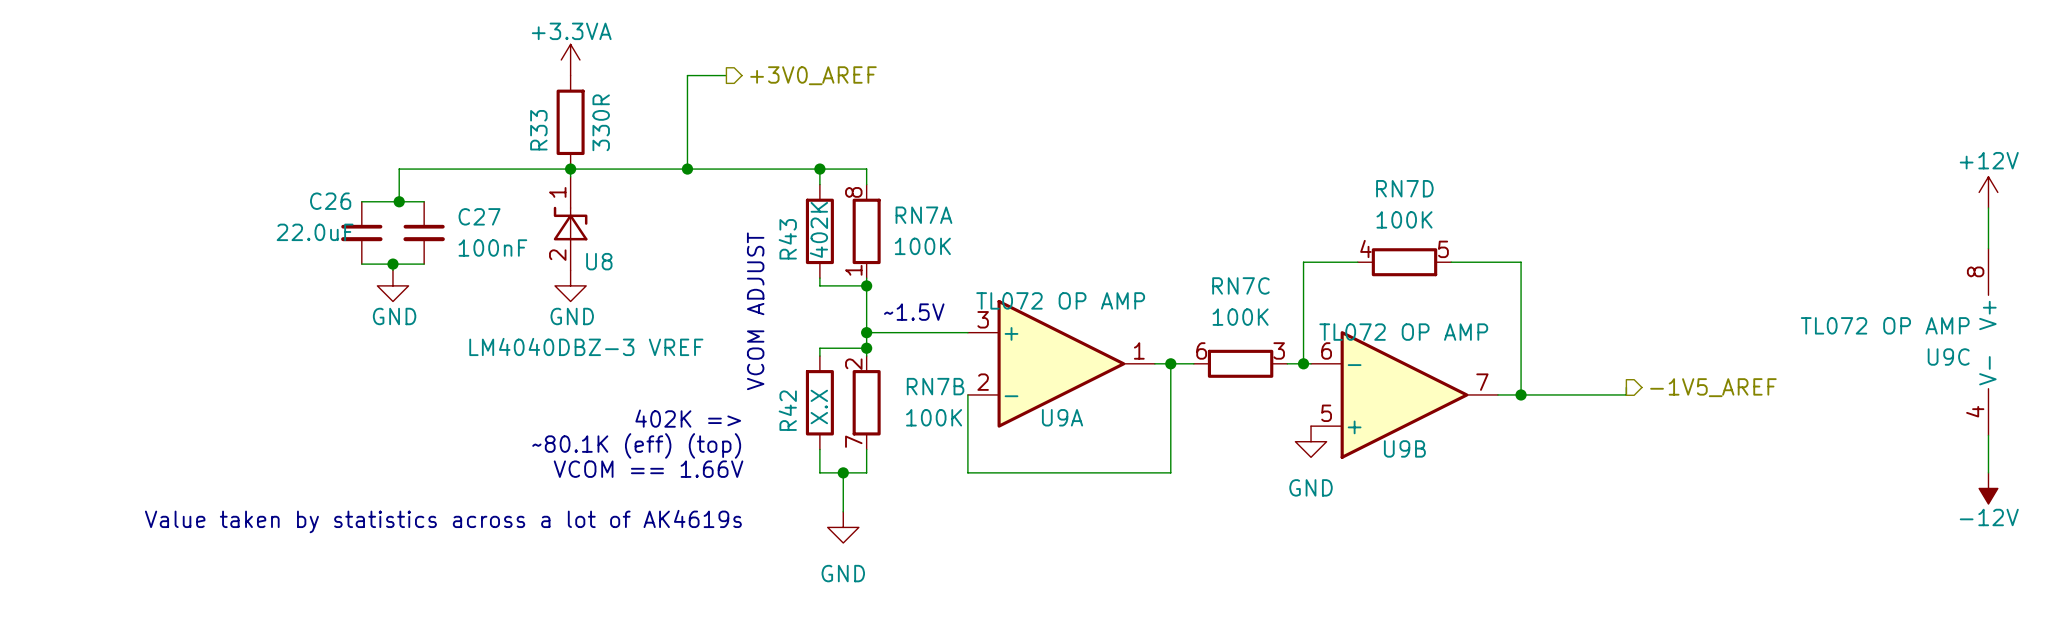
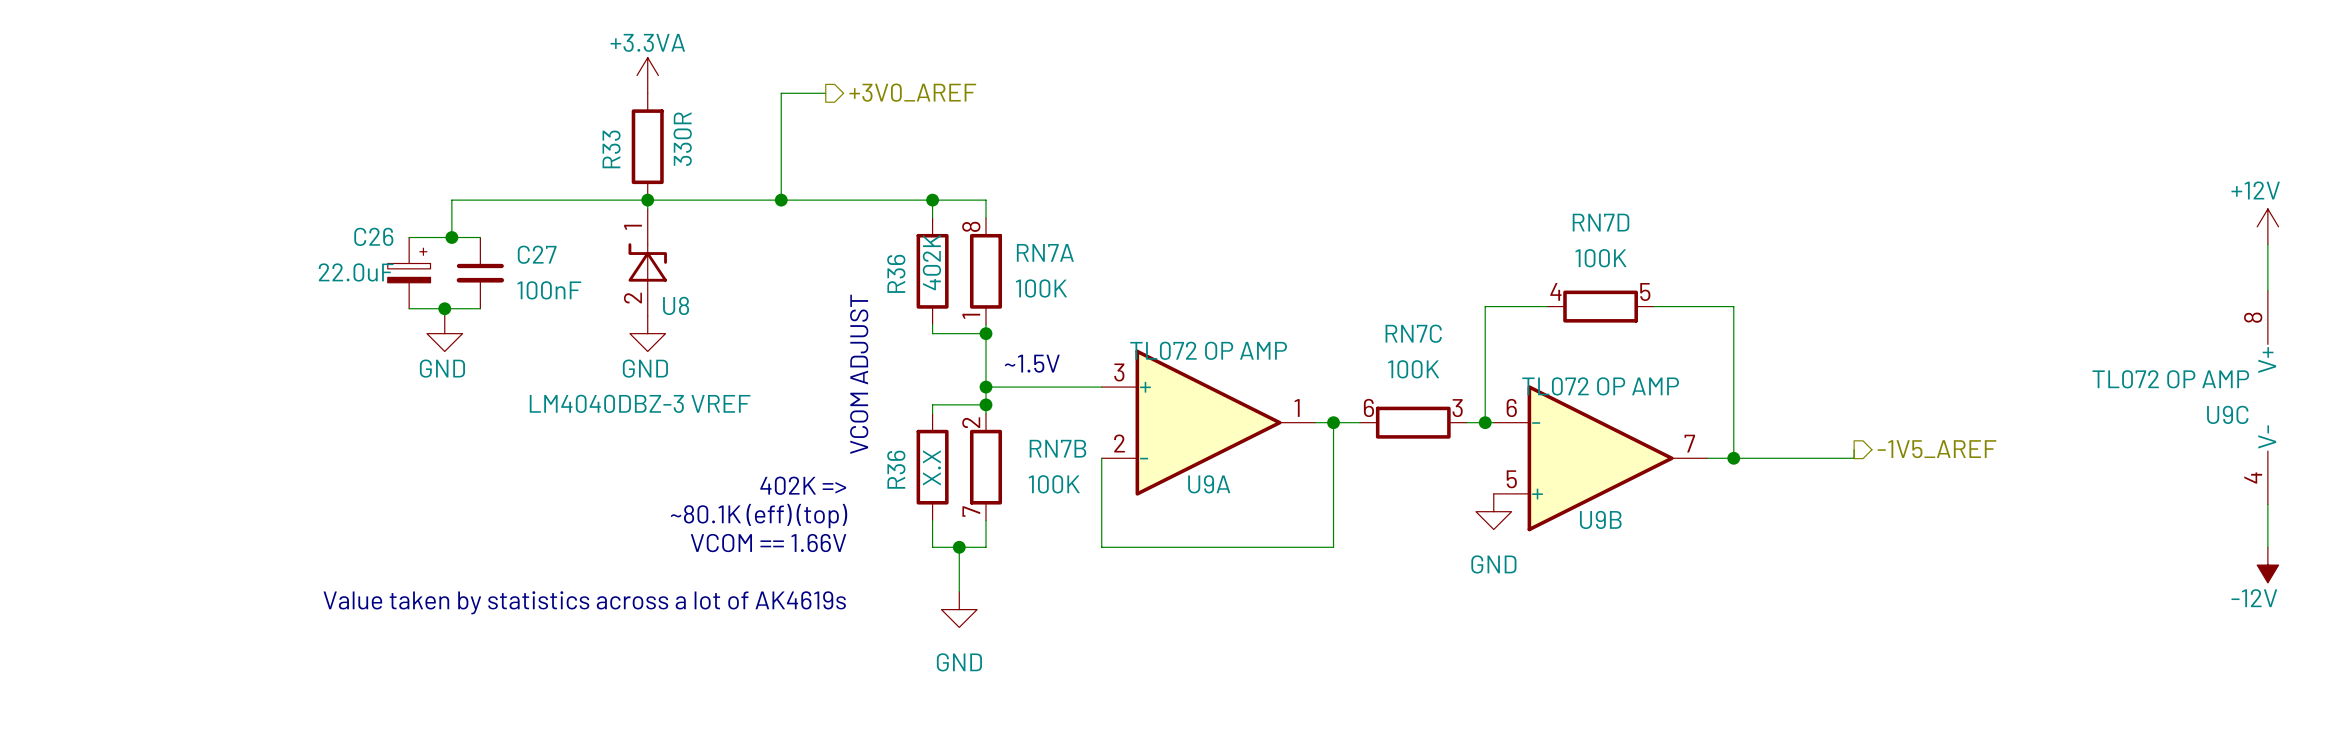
C26 symbol: [341, 201, 383, 265] -> [387, 237, 431, 309]
R43 name: R43 (787, 239) -> R36 (896, 273)
R42 name: R42 (787, 410) -> R36 (896, 469)

